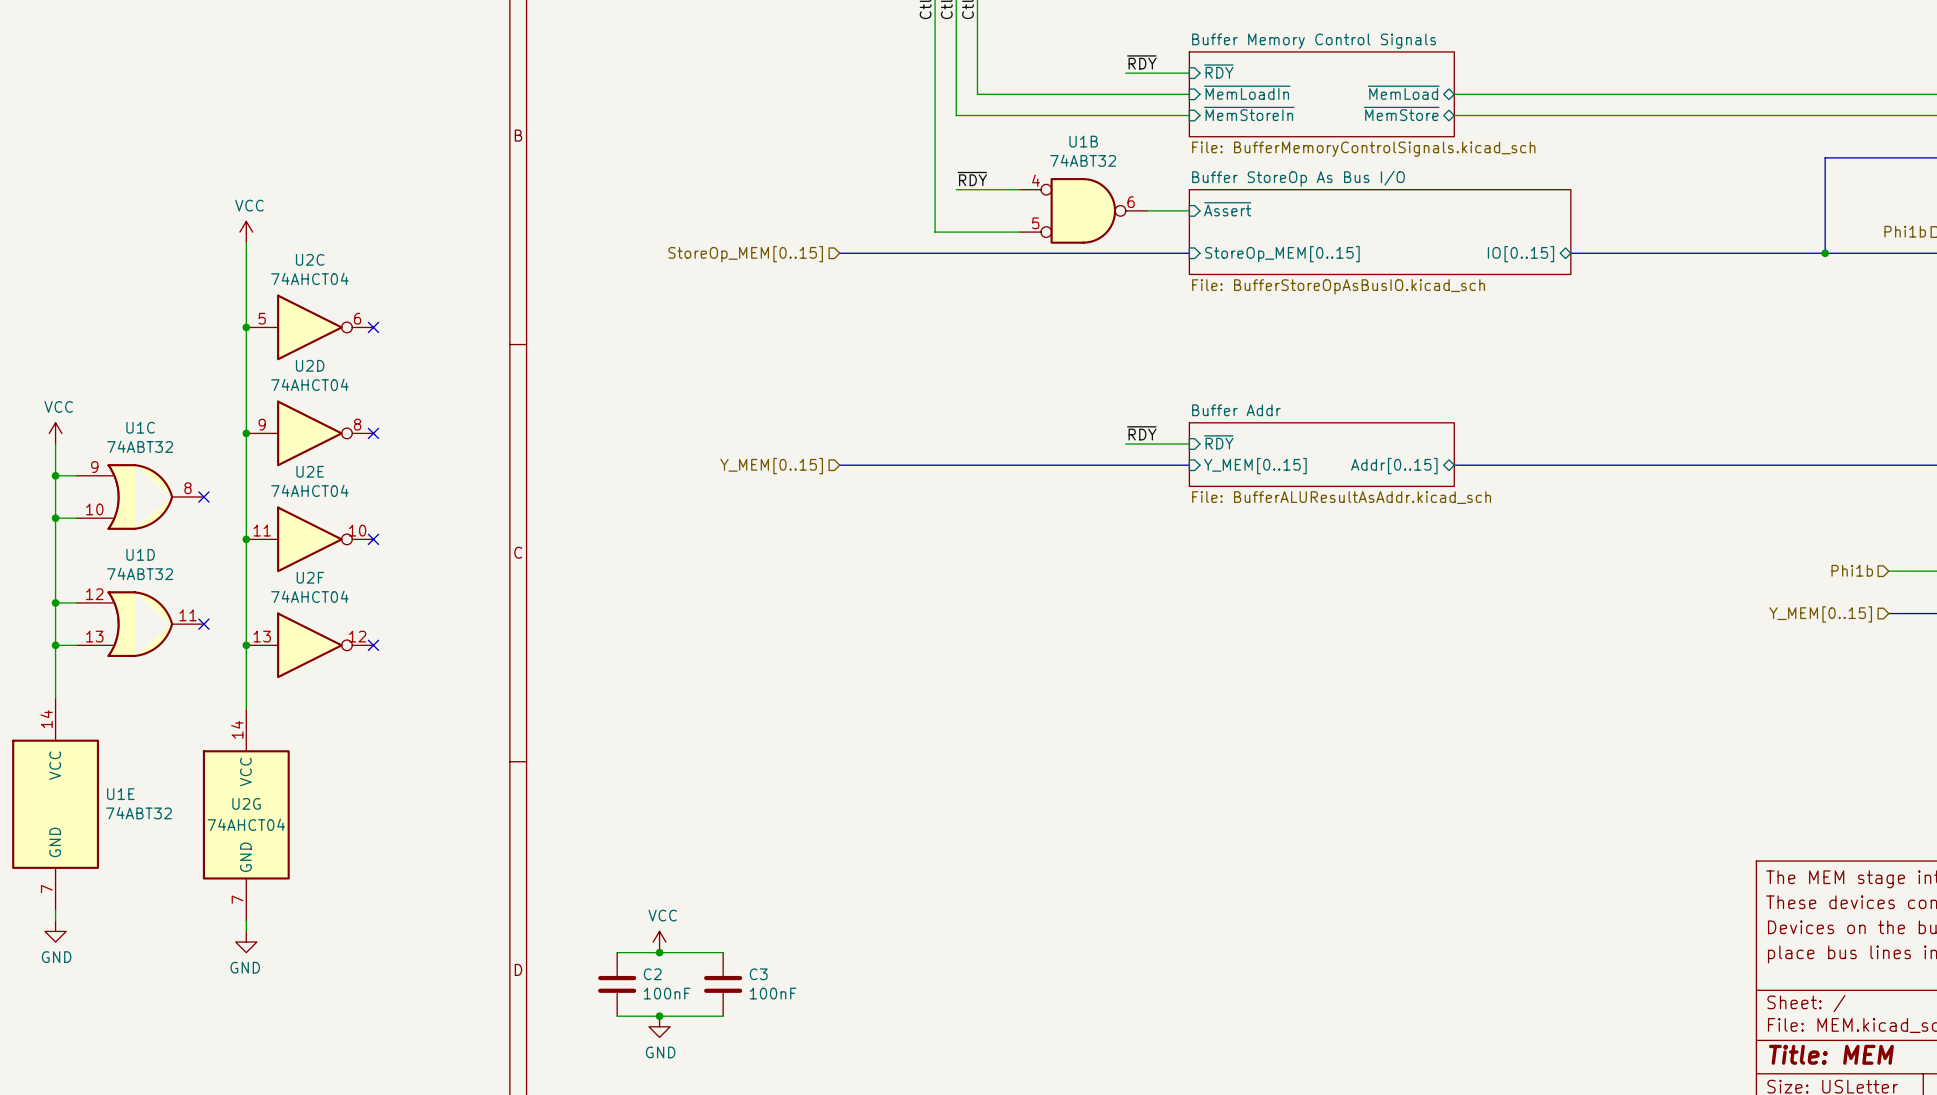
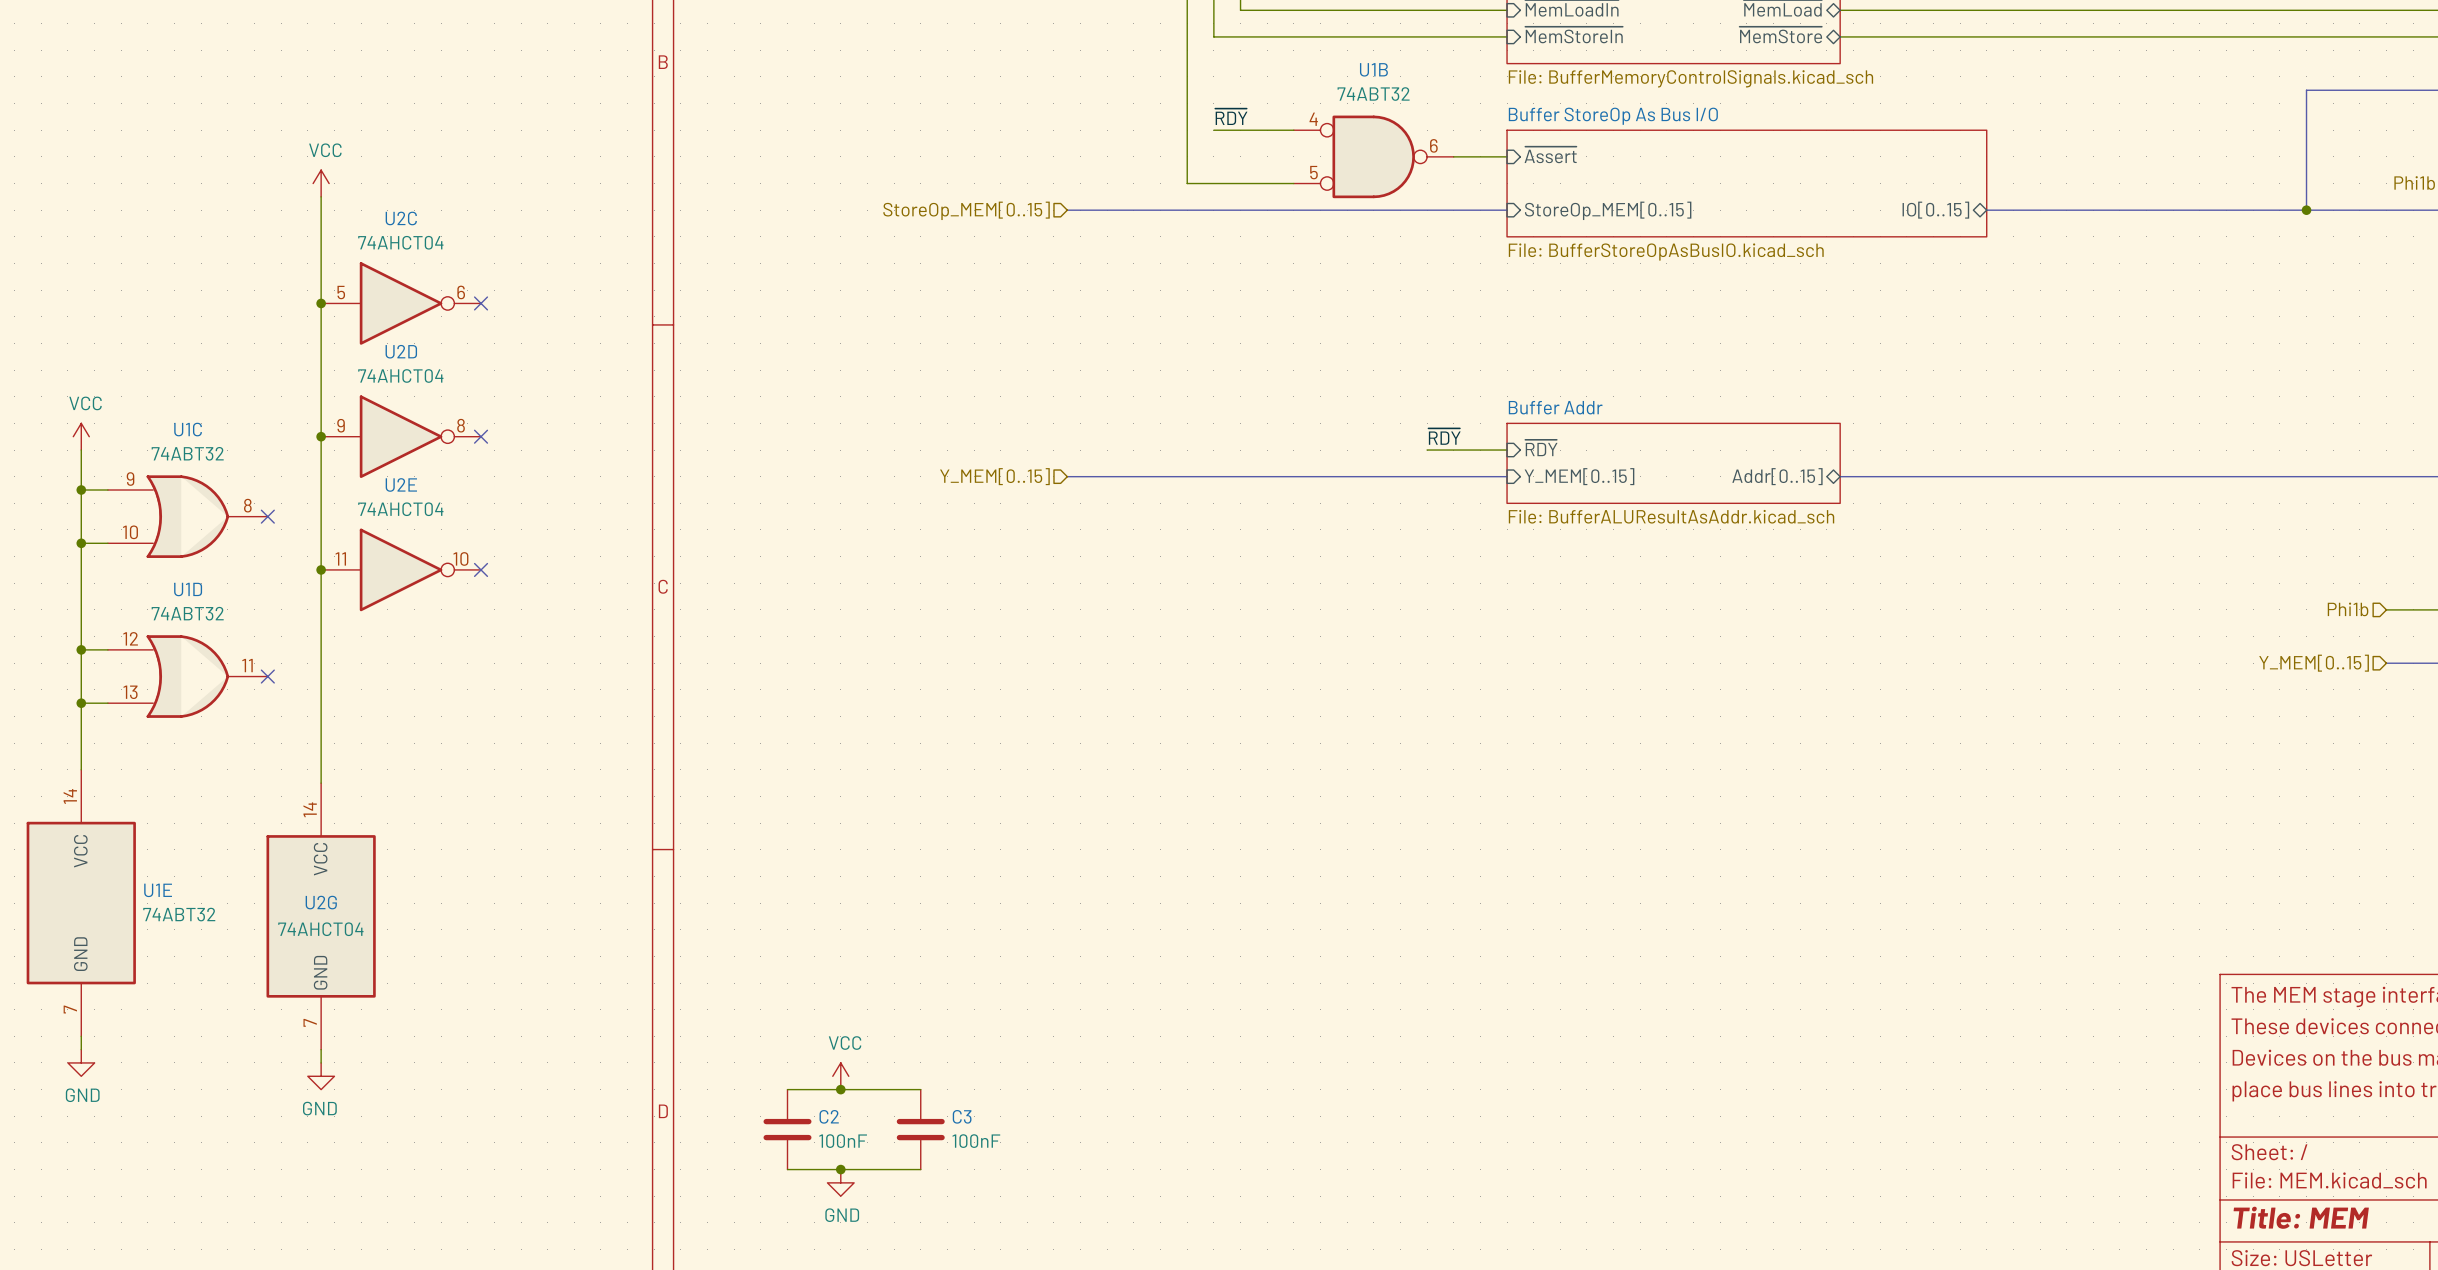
junction: (246, 645) -> none
U2F: 74AHCT04 (309, 645) -> none
no-connect mark: (373, 645) -> none

